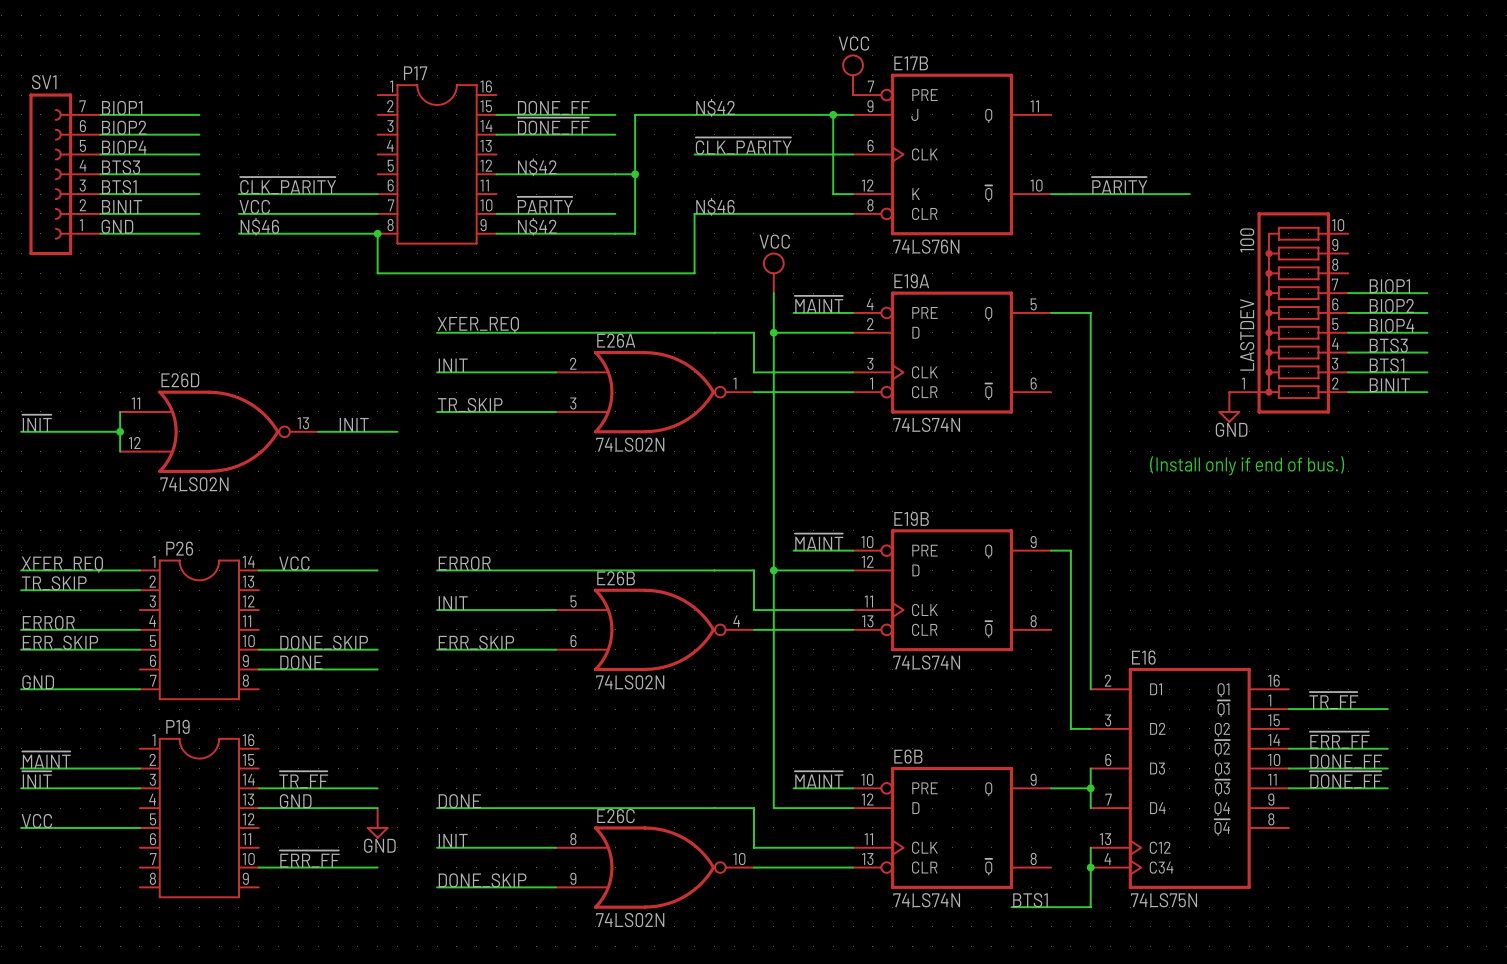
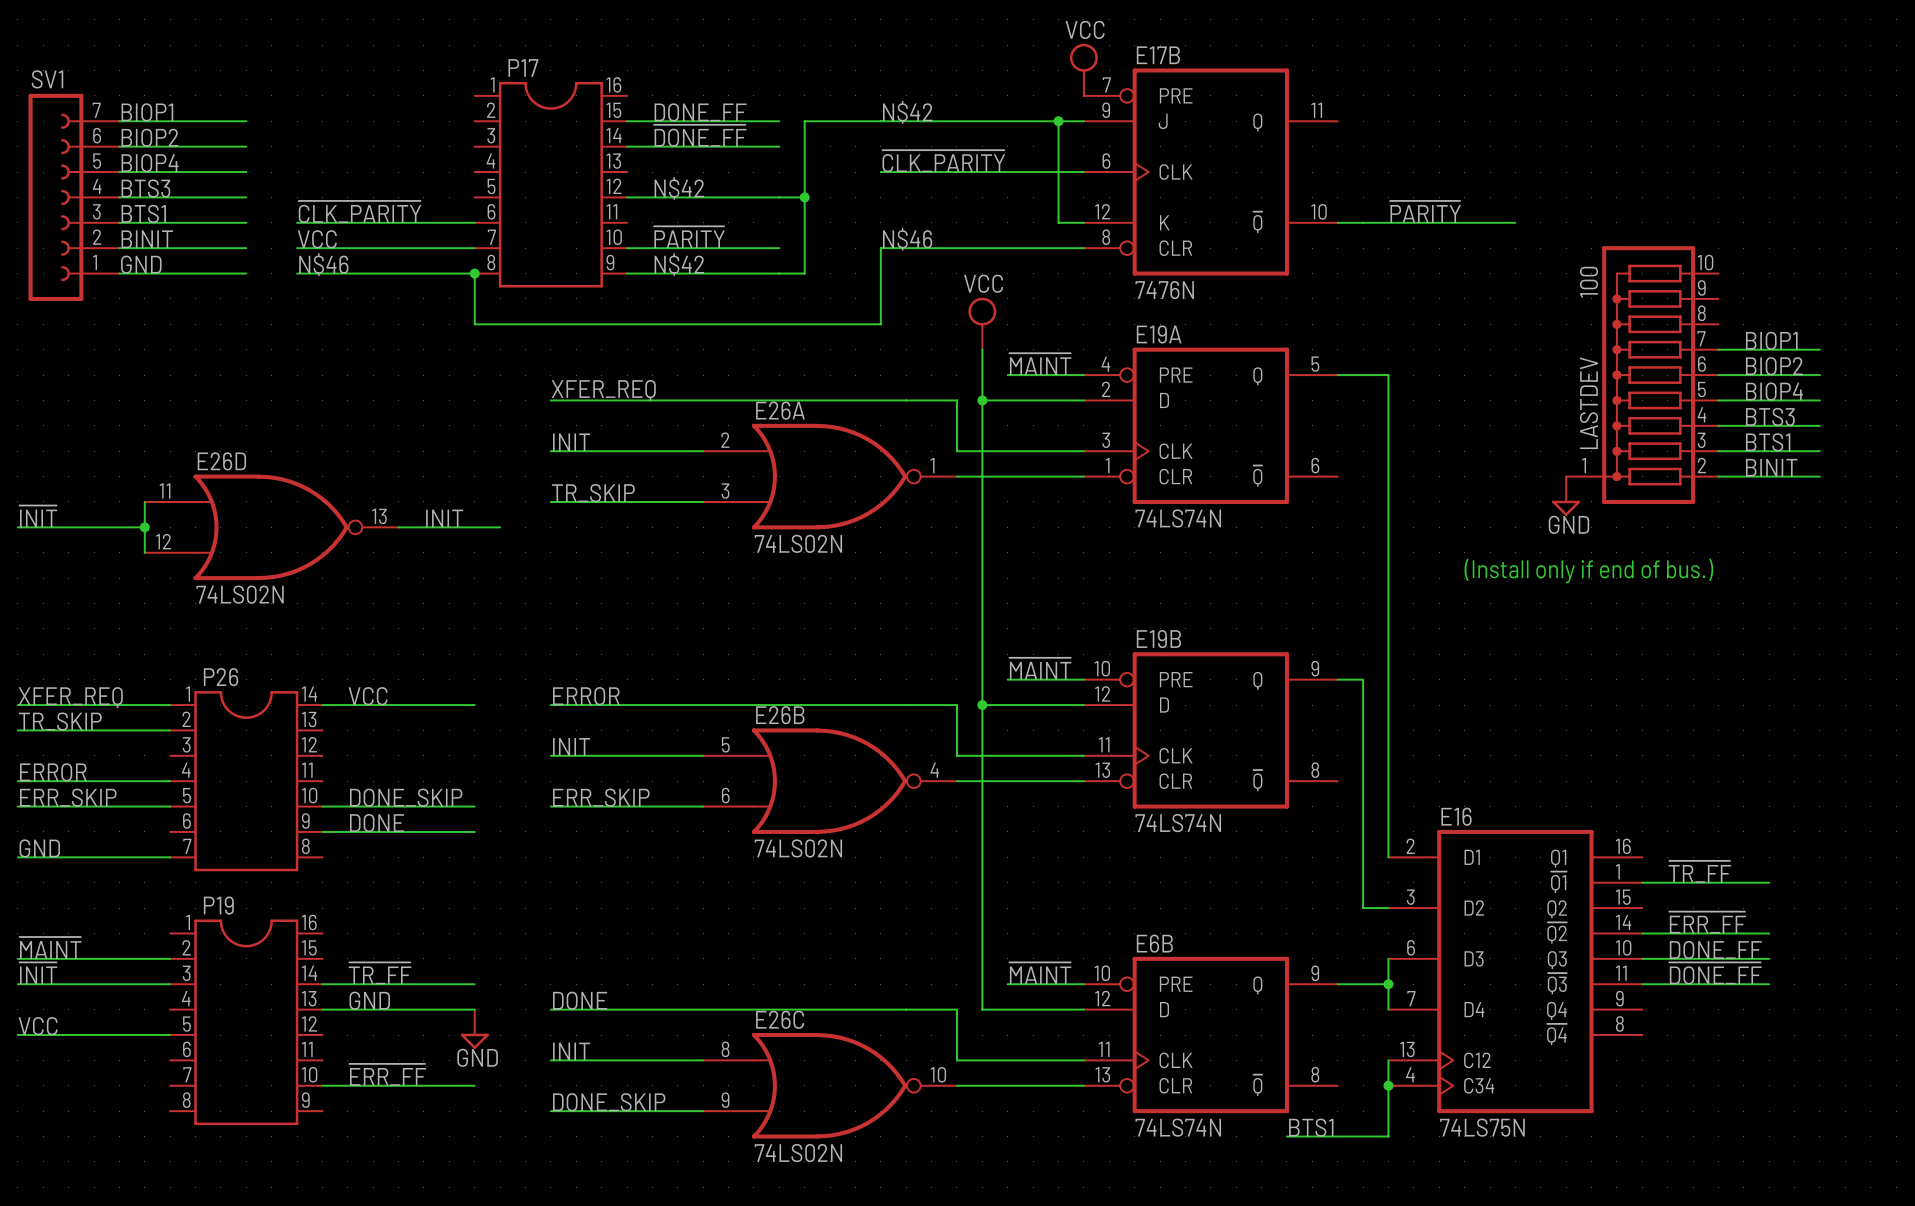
E17B value: 74LS76N (926, 246) -> 7476N (1164, 290)

